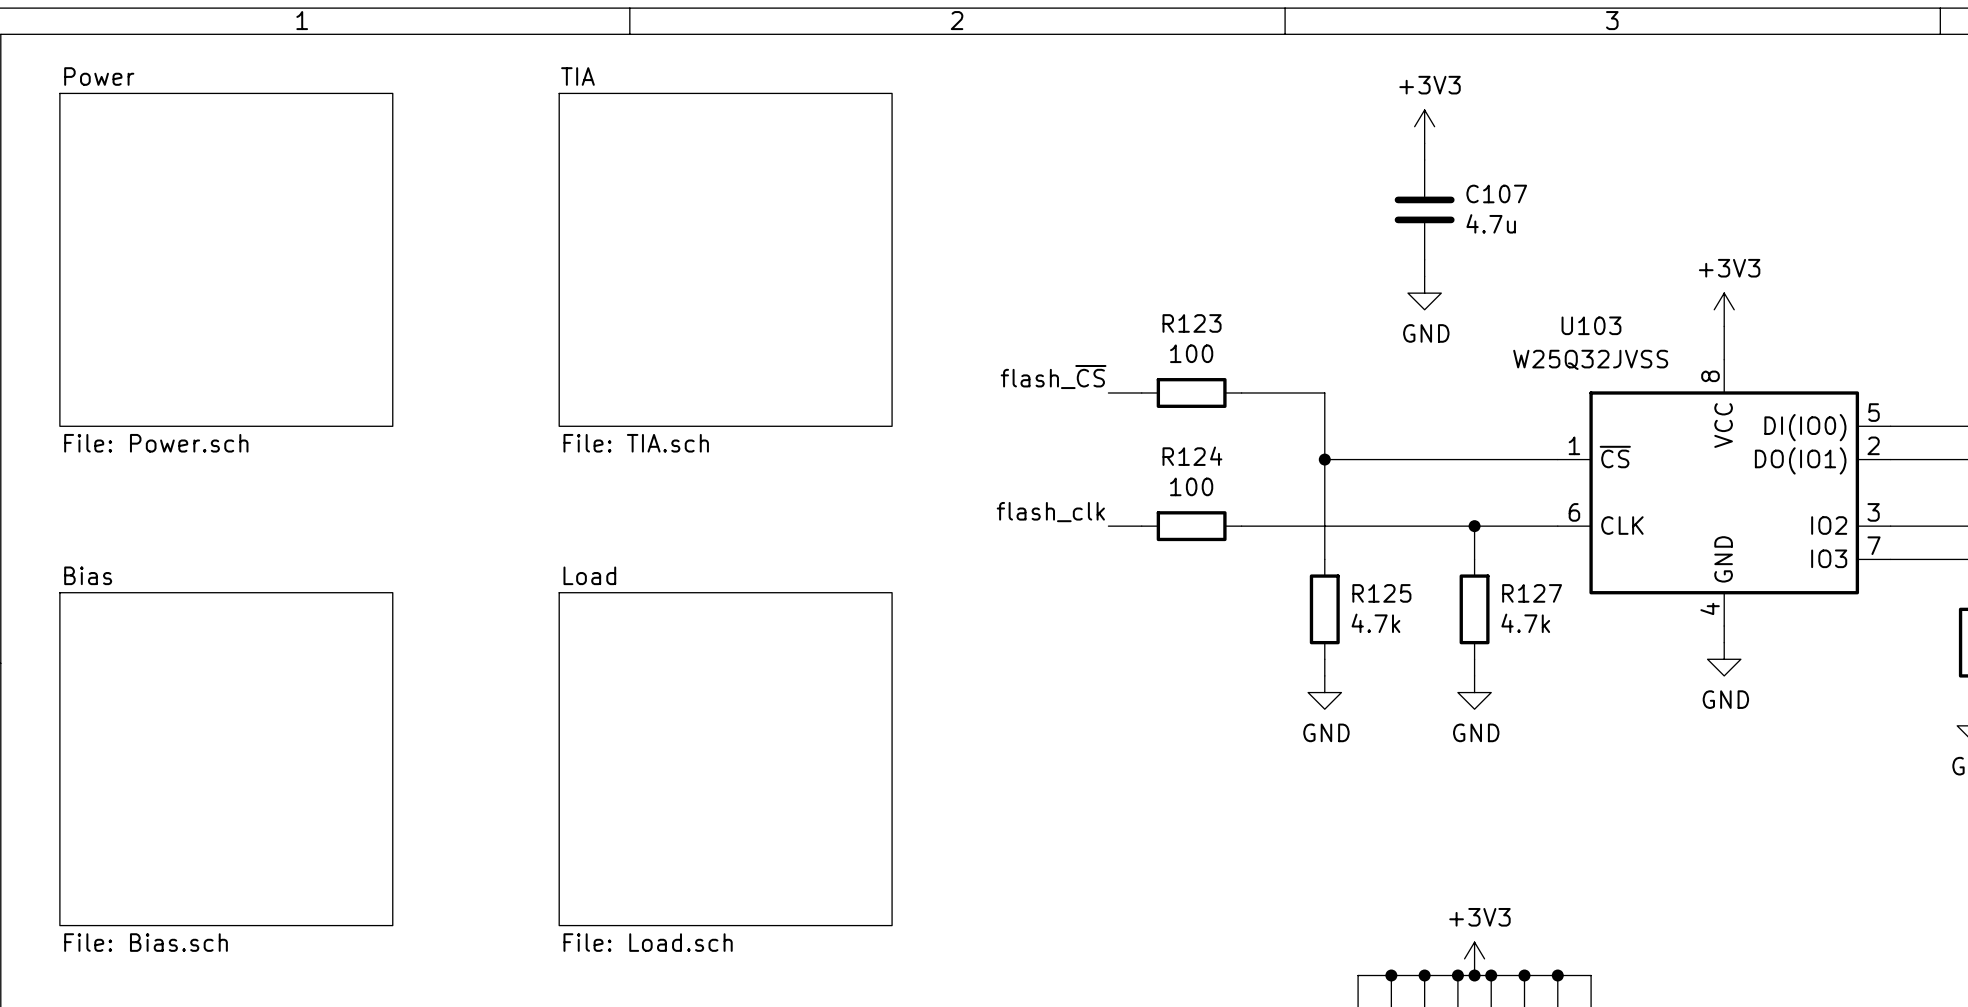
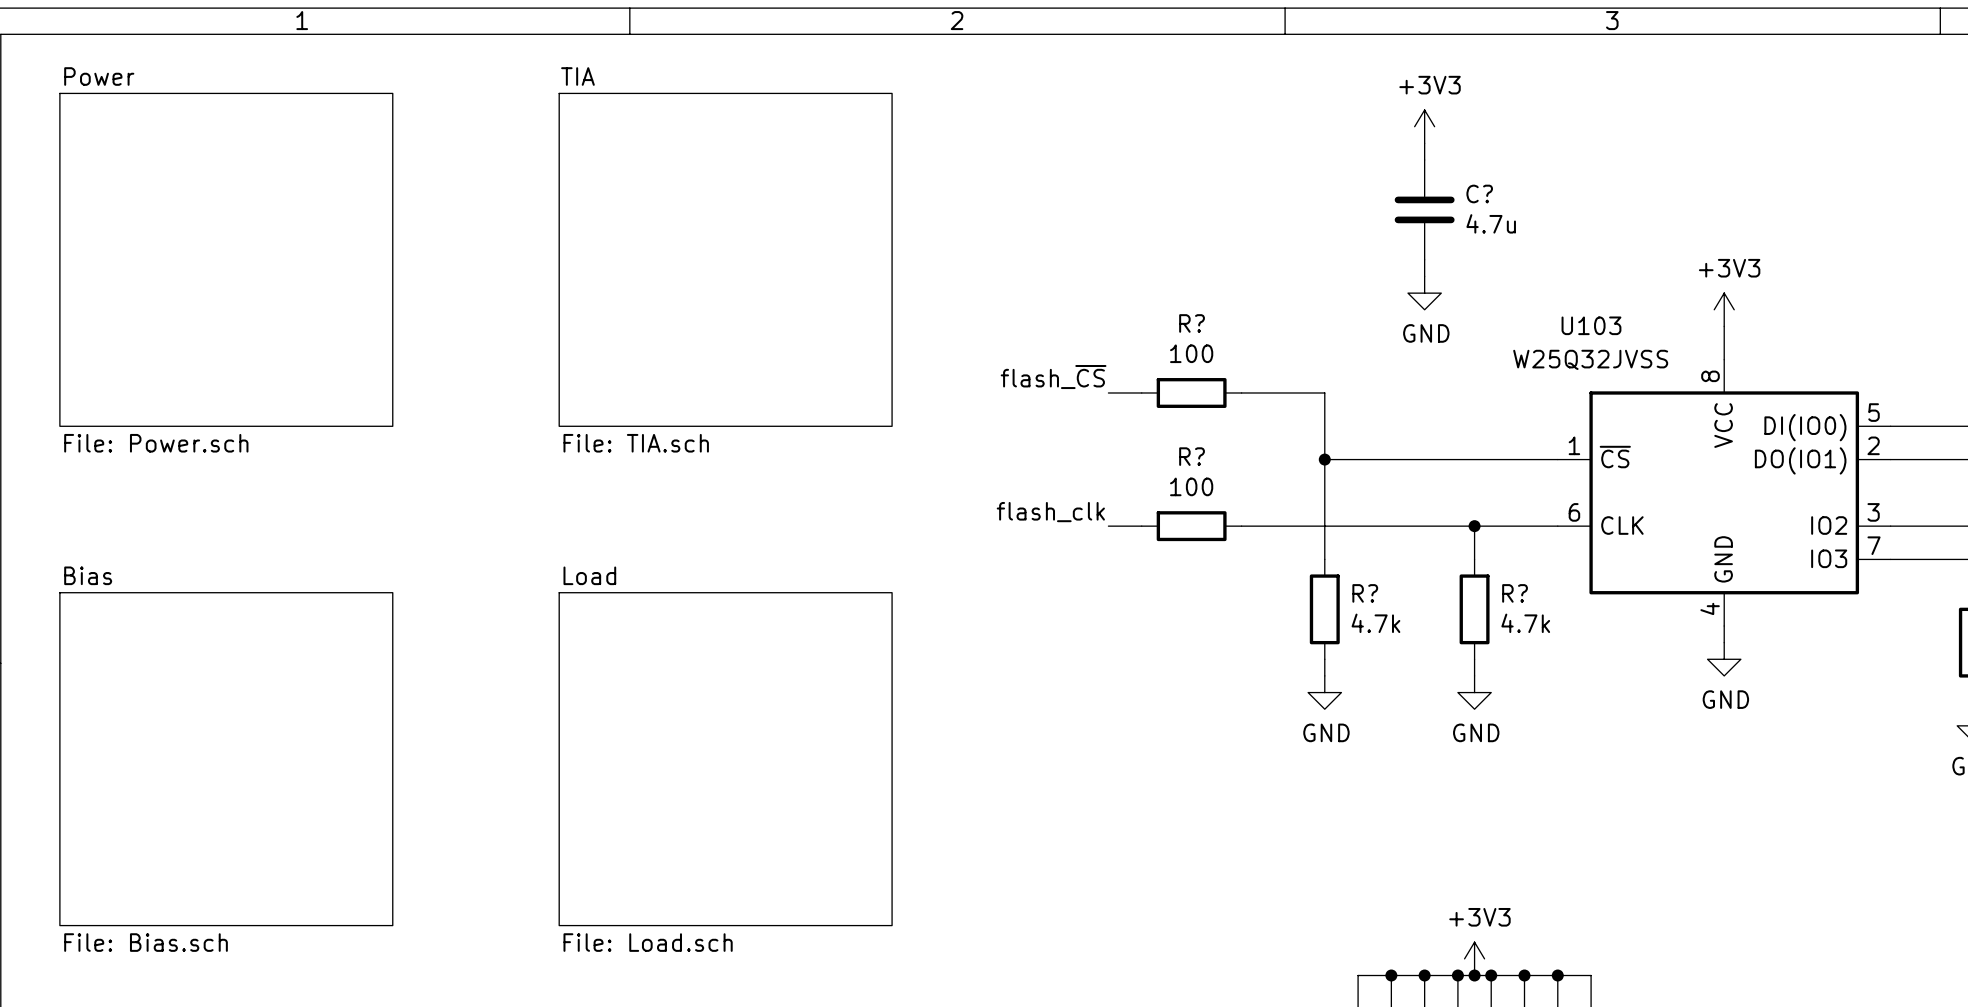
C107 name: C107 (1496, 193) -> C? (1479, 193)
R123 name: R123 (1192, 323) -> R? (1192, 323)
R124 name: R124 (1192, 456) -> R? (1192, 456)
R125 name: R125 (1381, 593) -> R? (1365, 593)
R127 name: R127 (1532, 593) -> R? (1515, 593)

